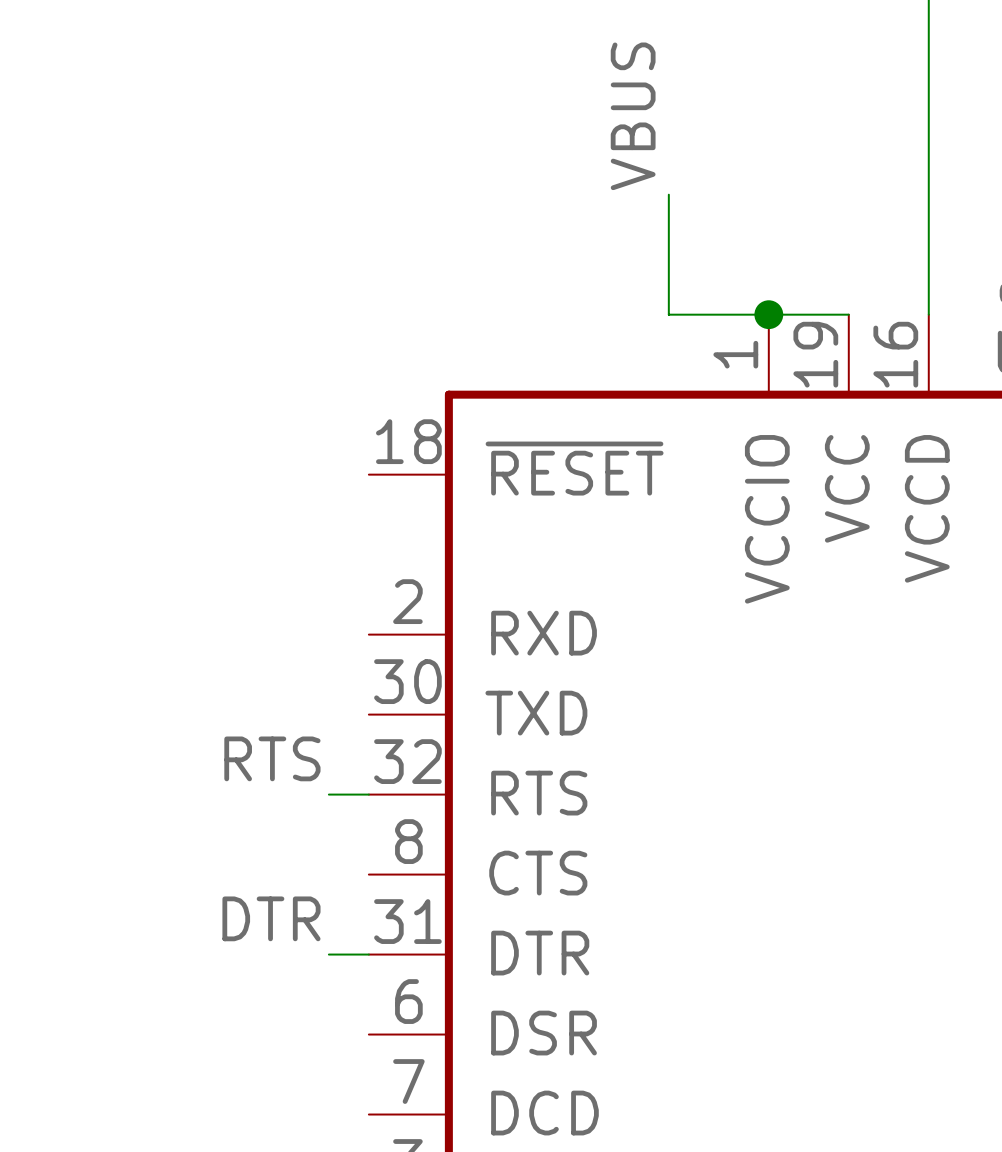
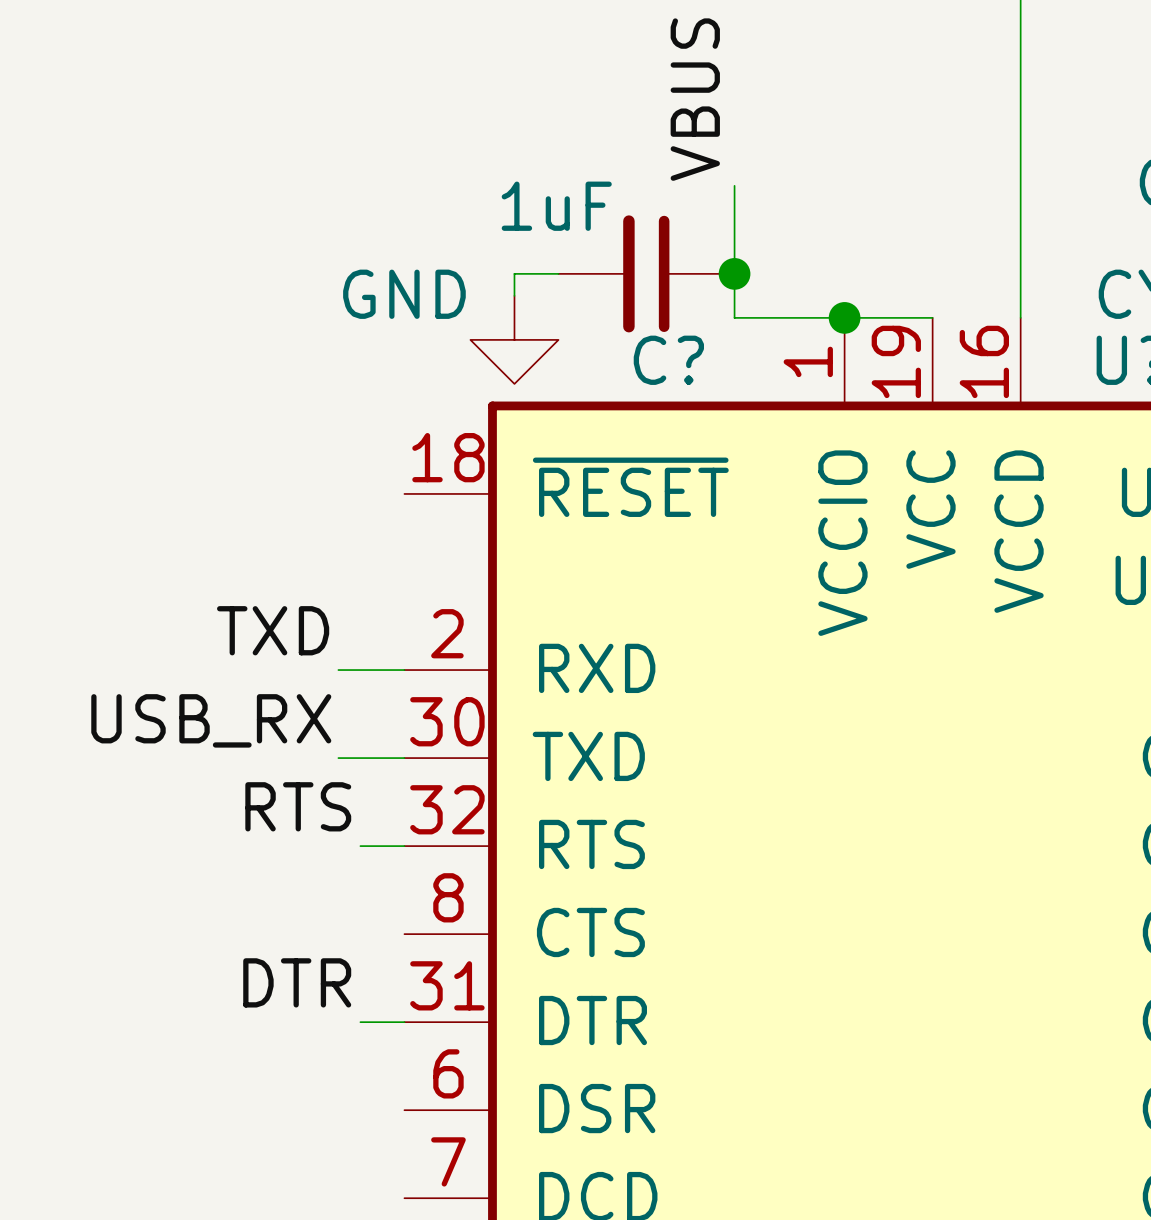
wire: none -> (558, 273) (514, 273) (514, 295)
C?: none -> 1uF (646, 273)
junction: none -> (734, 273)
power symbol: none -> GND (514, 339)
label: none -> TXD (273, 630)
wire: none -> (338, 670) (404, 670)
label: none -> USB_RX (211, 720)
wire: none -> (338, 758) (404, 758)

